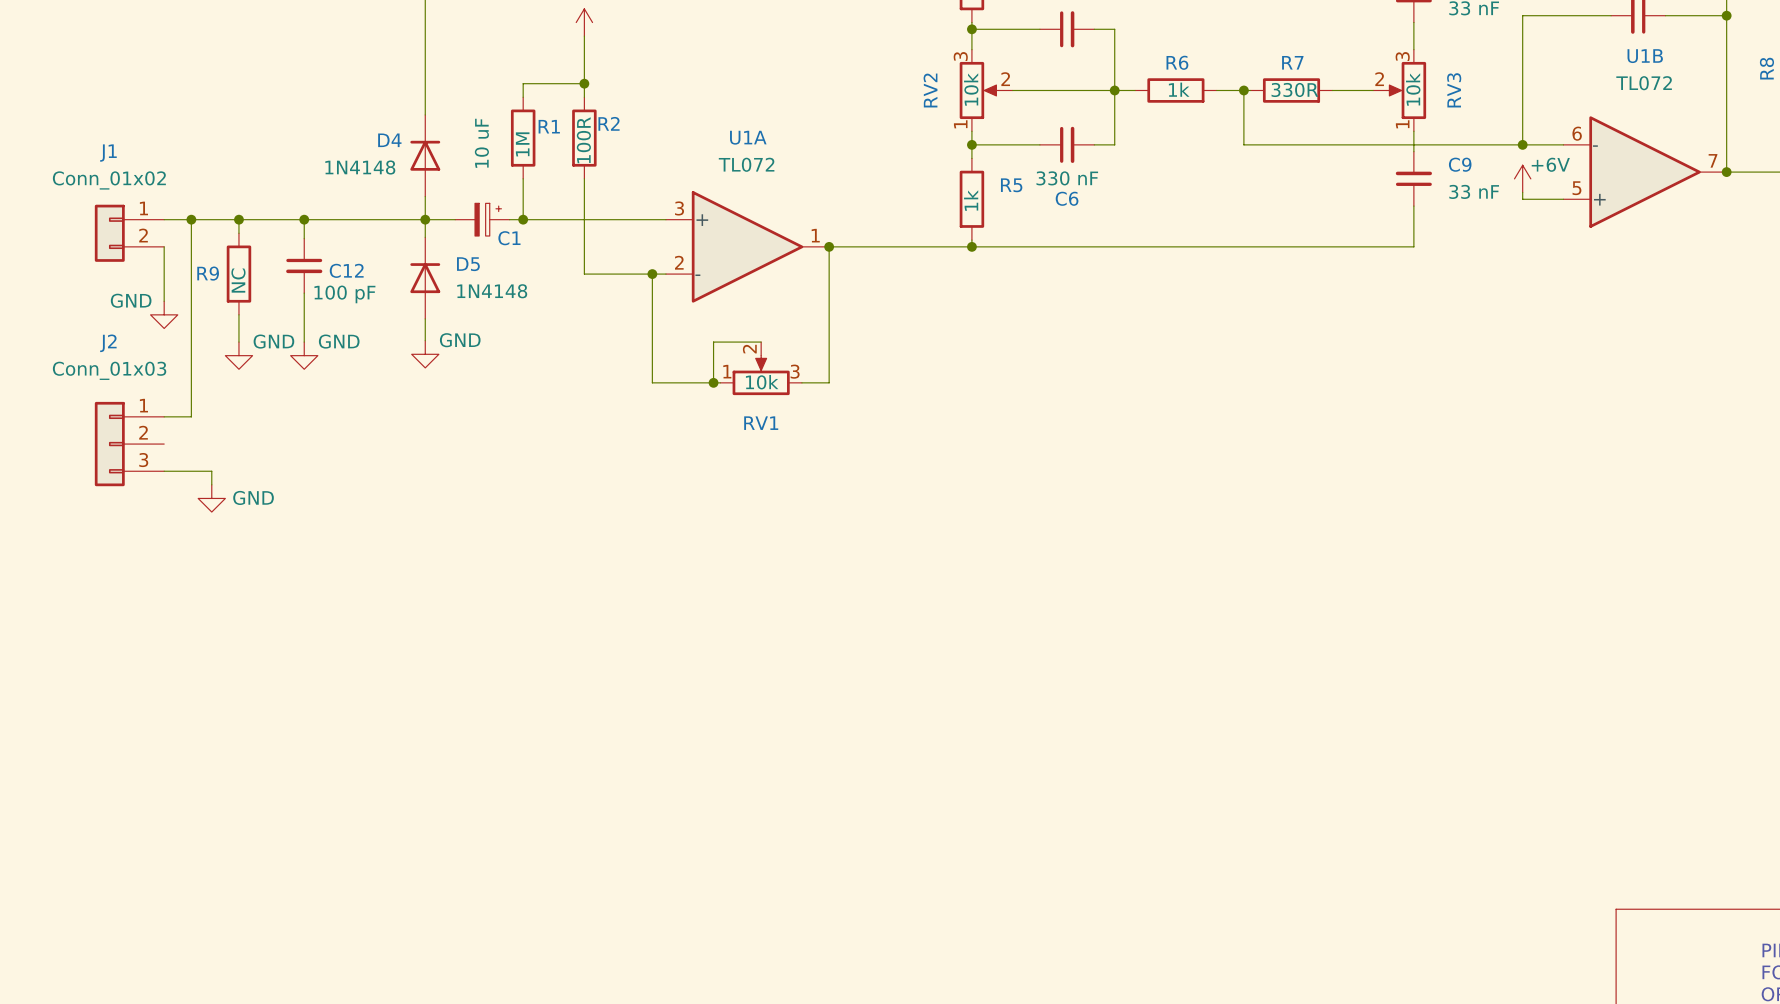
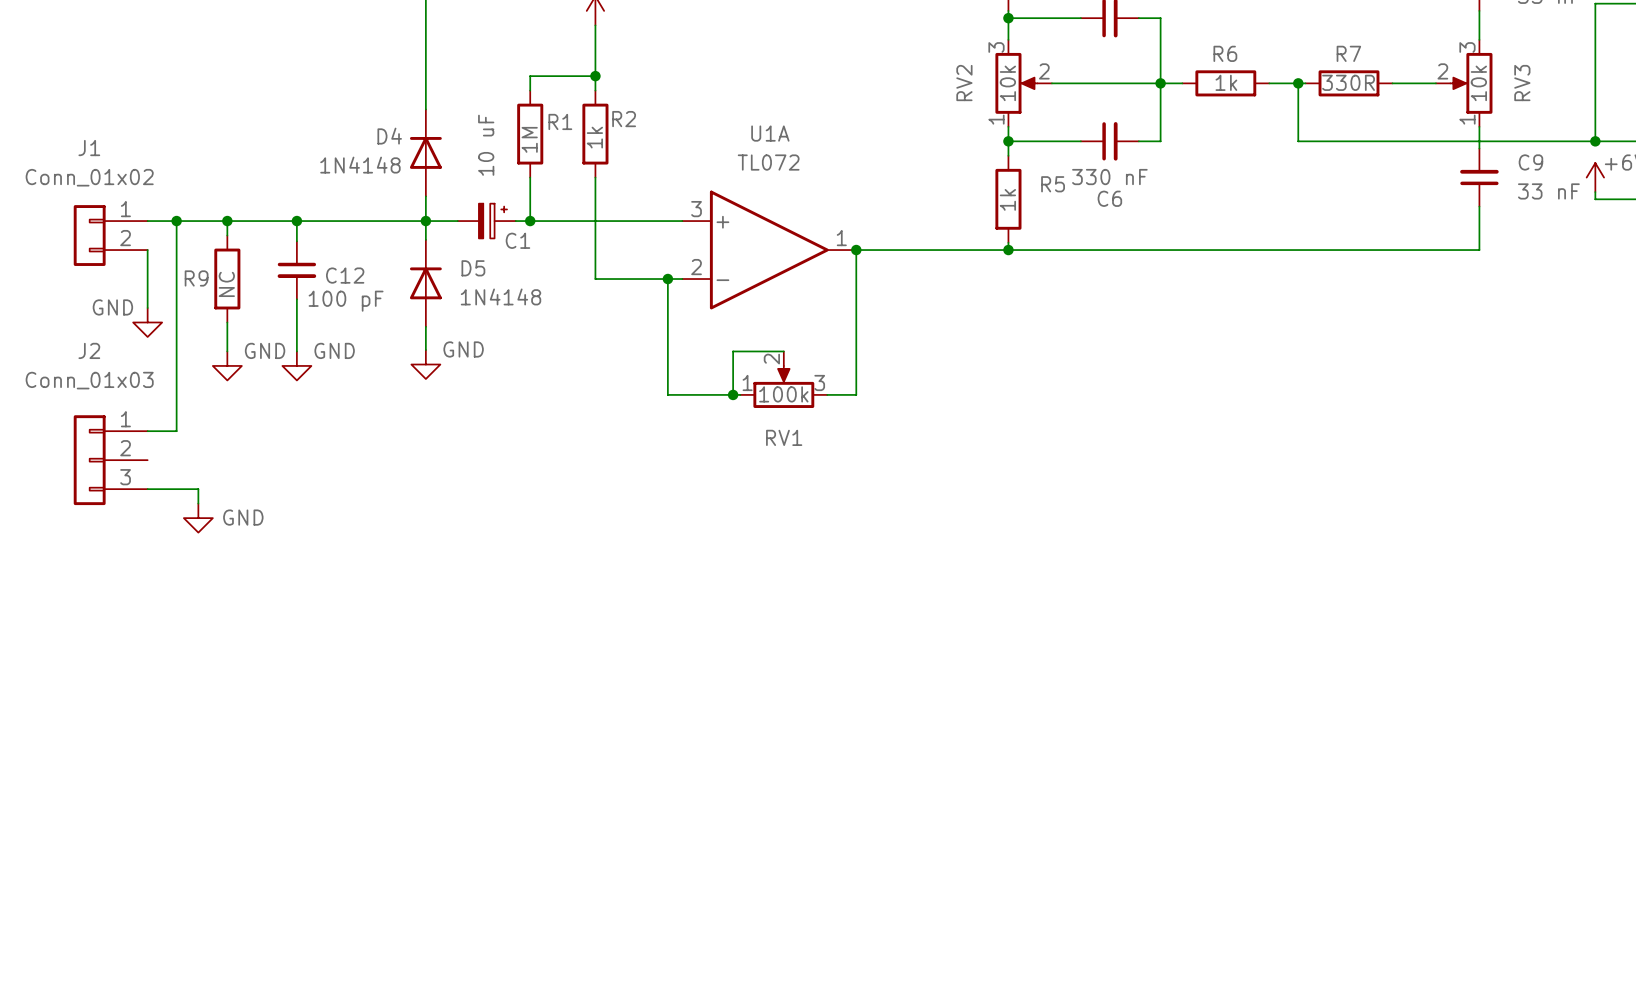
R2 value: 100R (583, 140) -> 1k (594, 137)
RV1 value: 10k (762, 382) -> 100k (783, 394)

